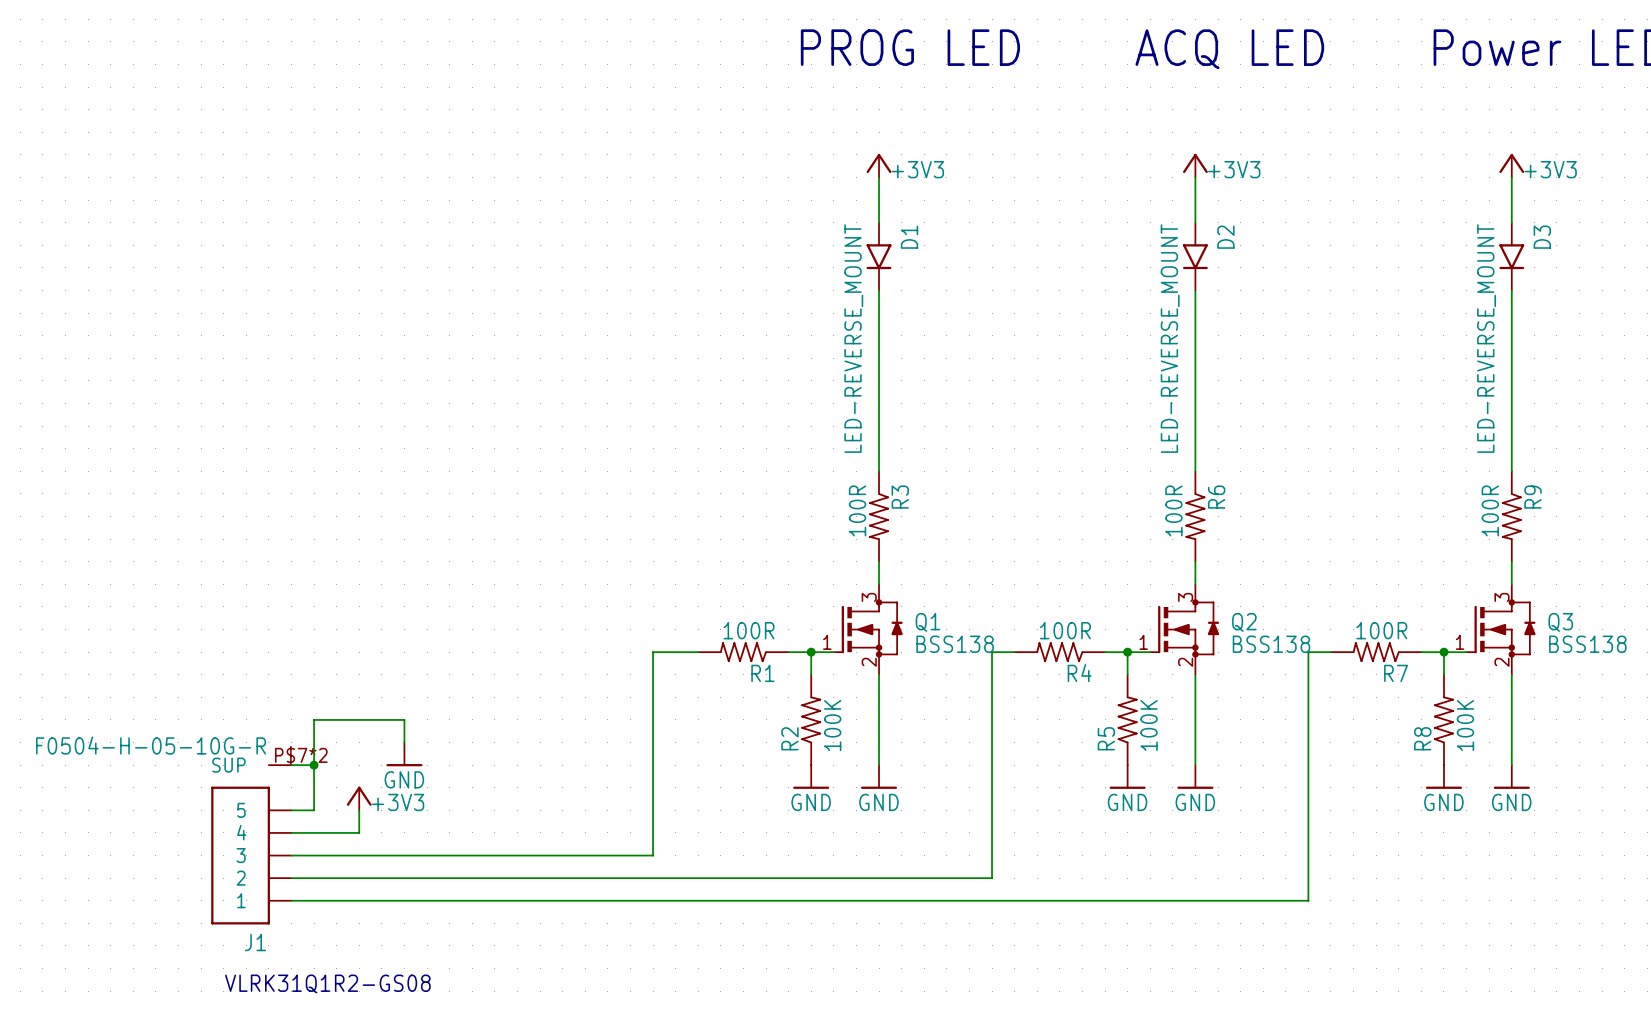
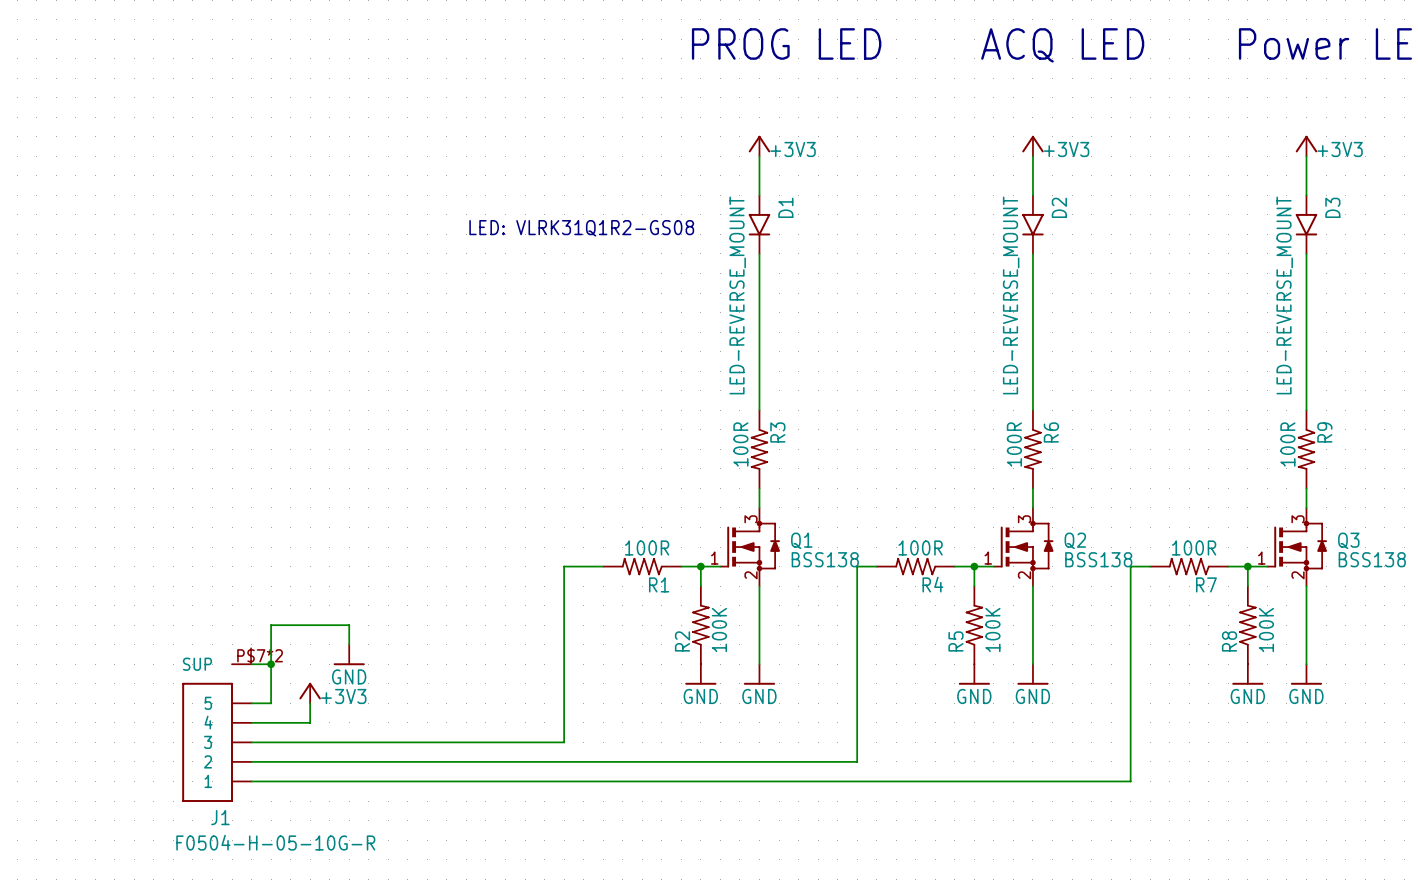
text: none -> LED: VLRK31Q1R2-GS08 (581, 228)
J1 value position: F0504-H-05-10G-R (151, 745) -> F0504-H-05-10G-R (275, 842)
text: VLRK31Q1R2-GS08 (327, 983) -> none

